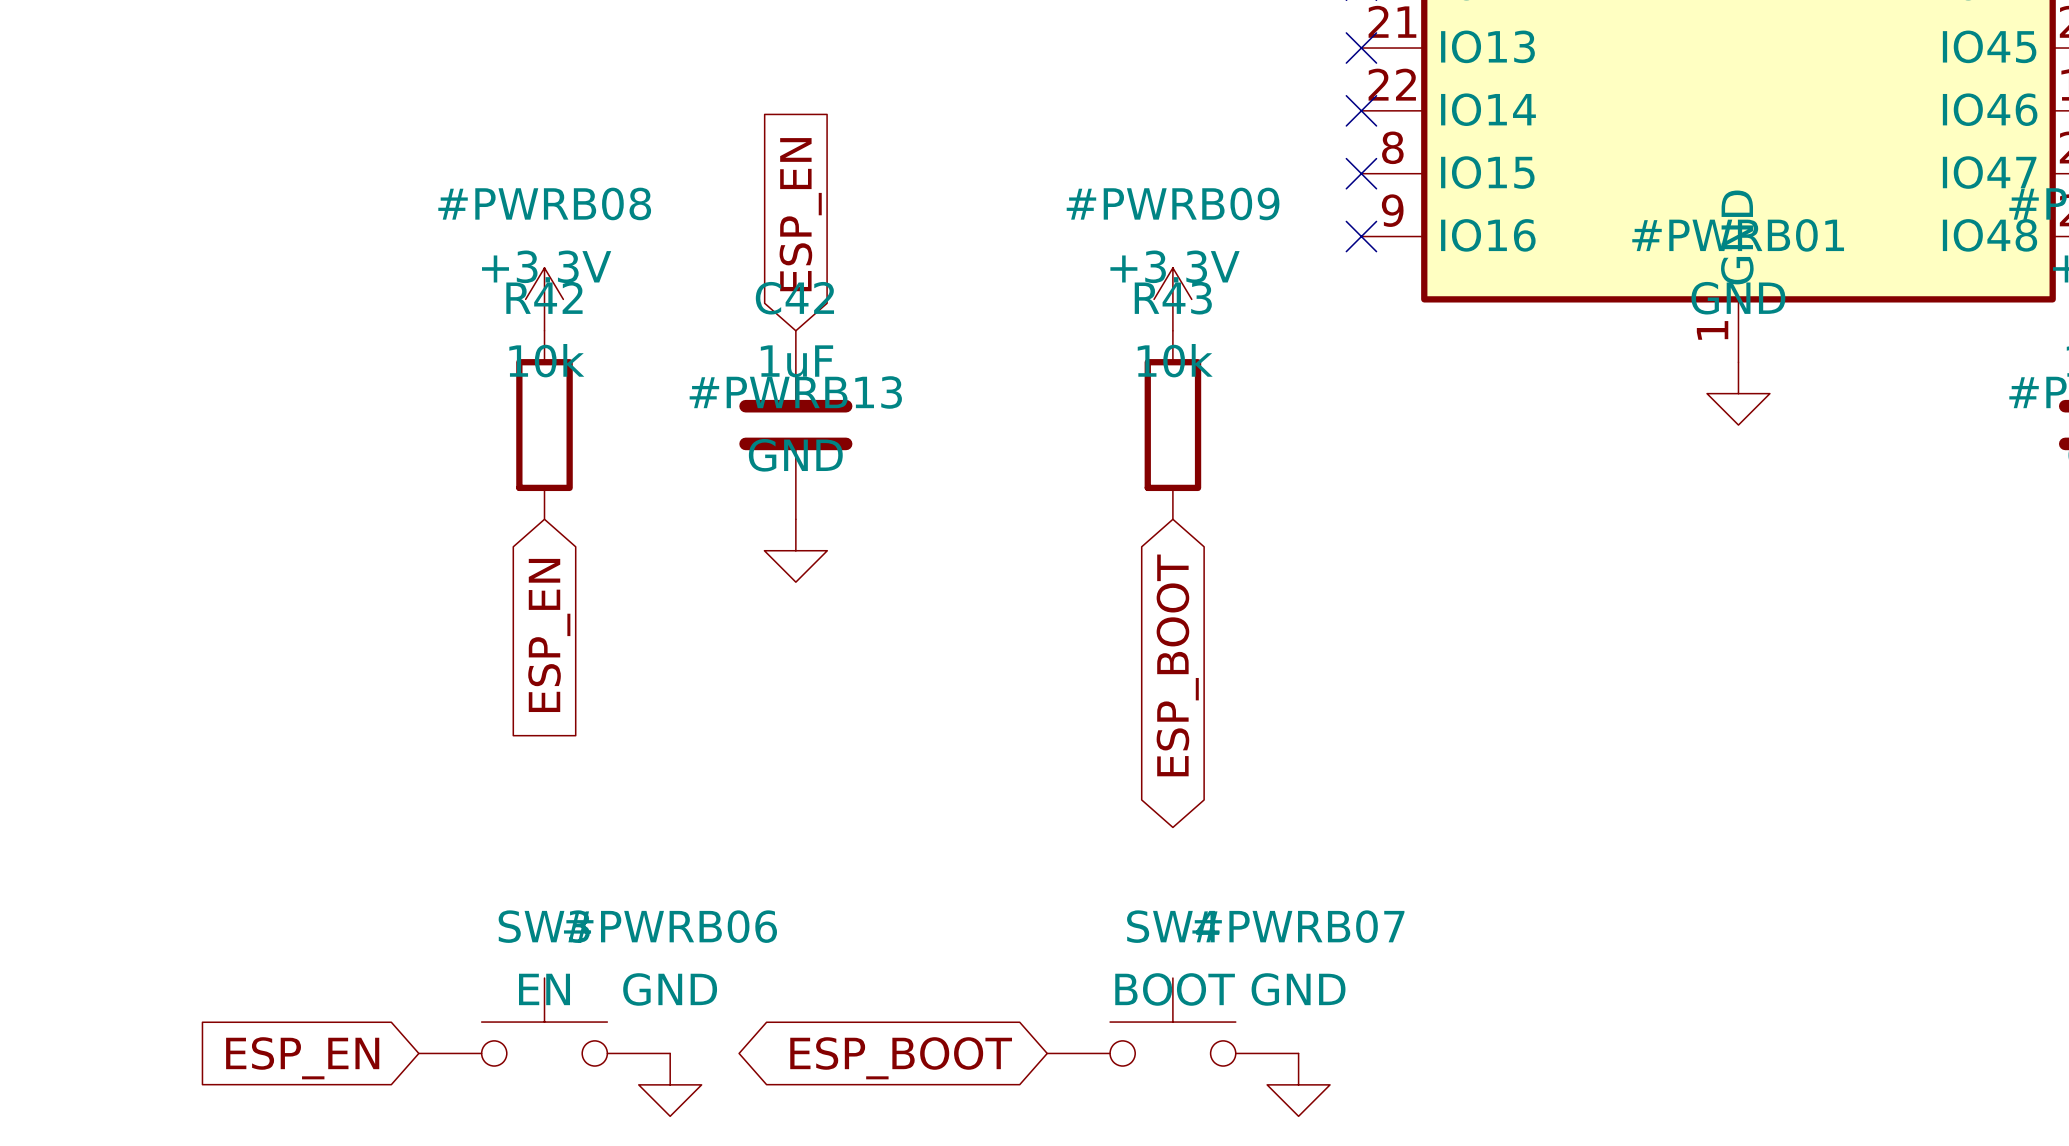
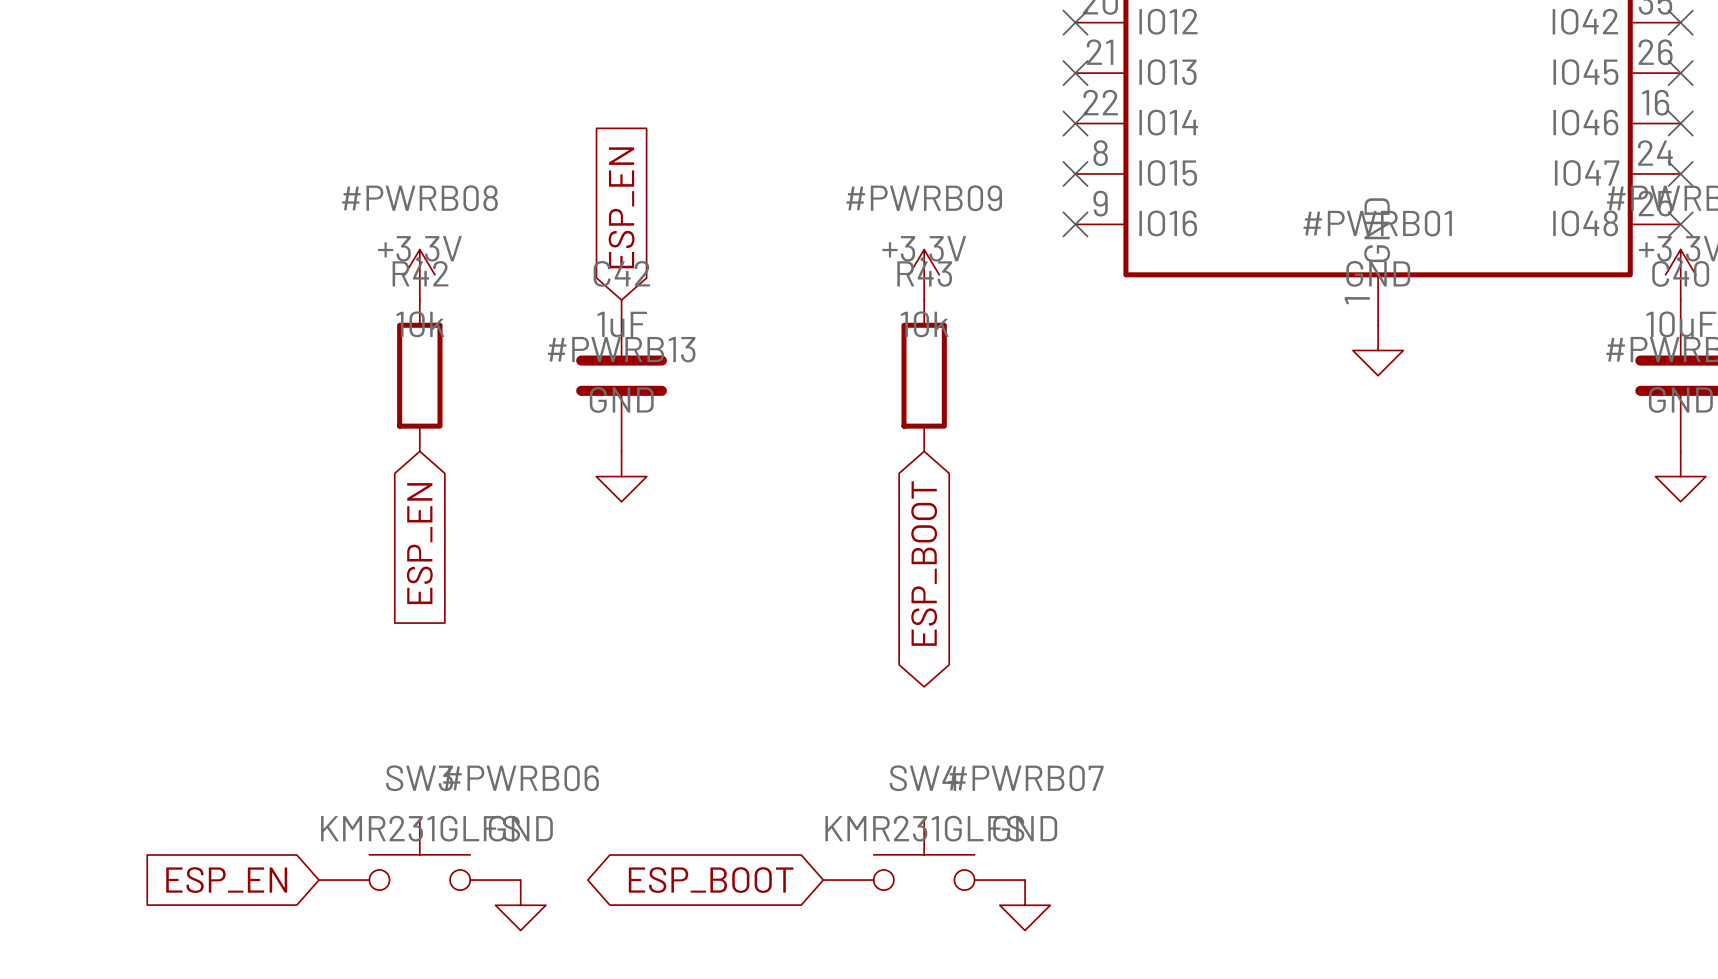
SW3 value: EN (544, 989) -> KMR231GLFS (420, 828)
SW4 value: BOOT (1175, 989) -> KMR231GLFS (924, 828)

